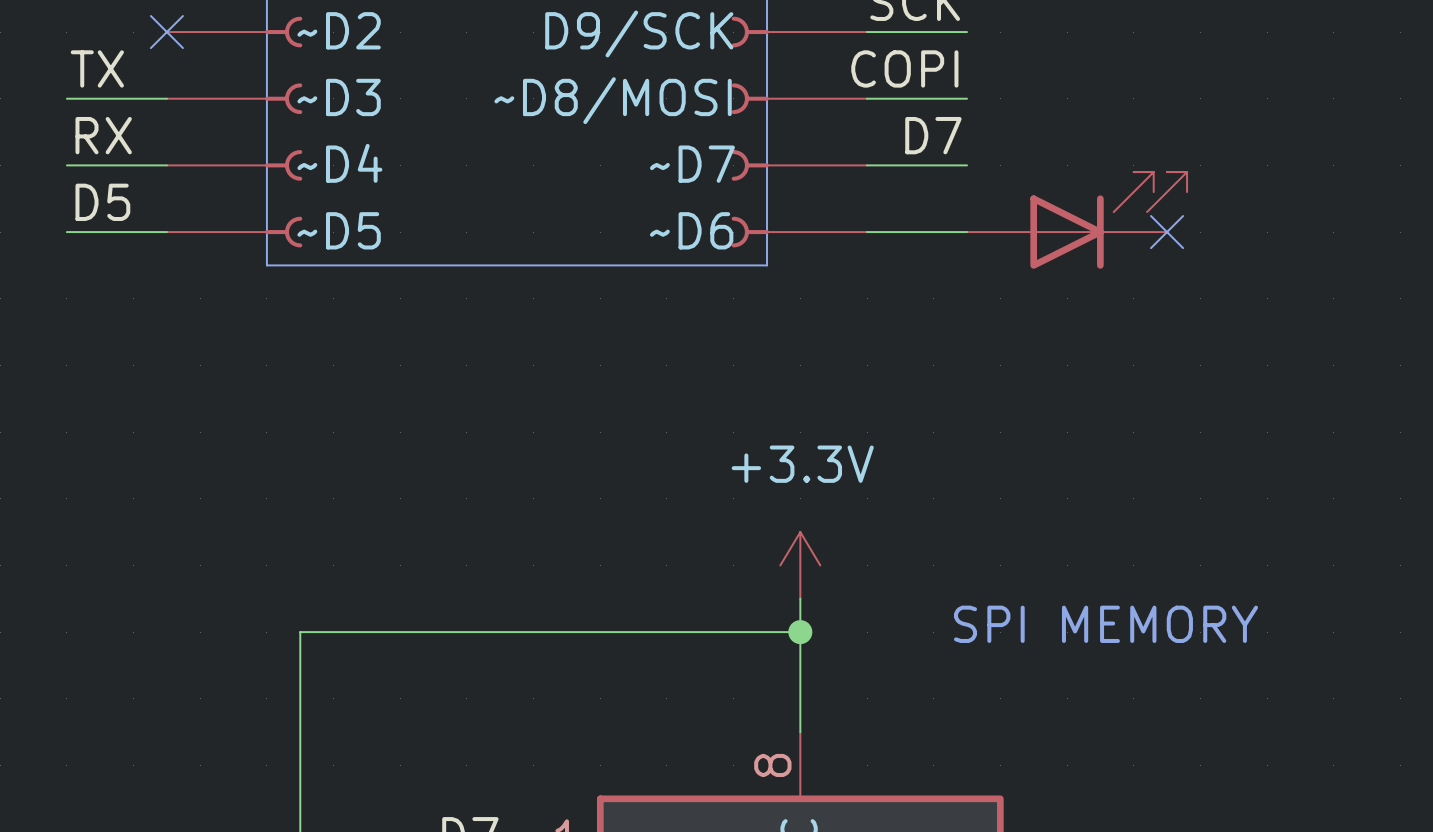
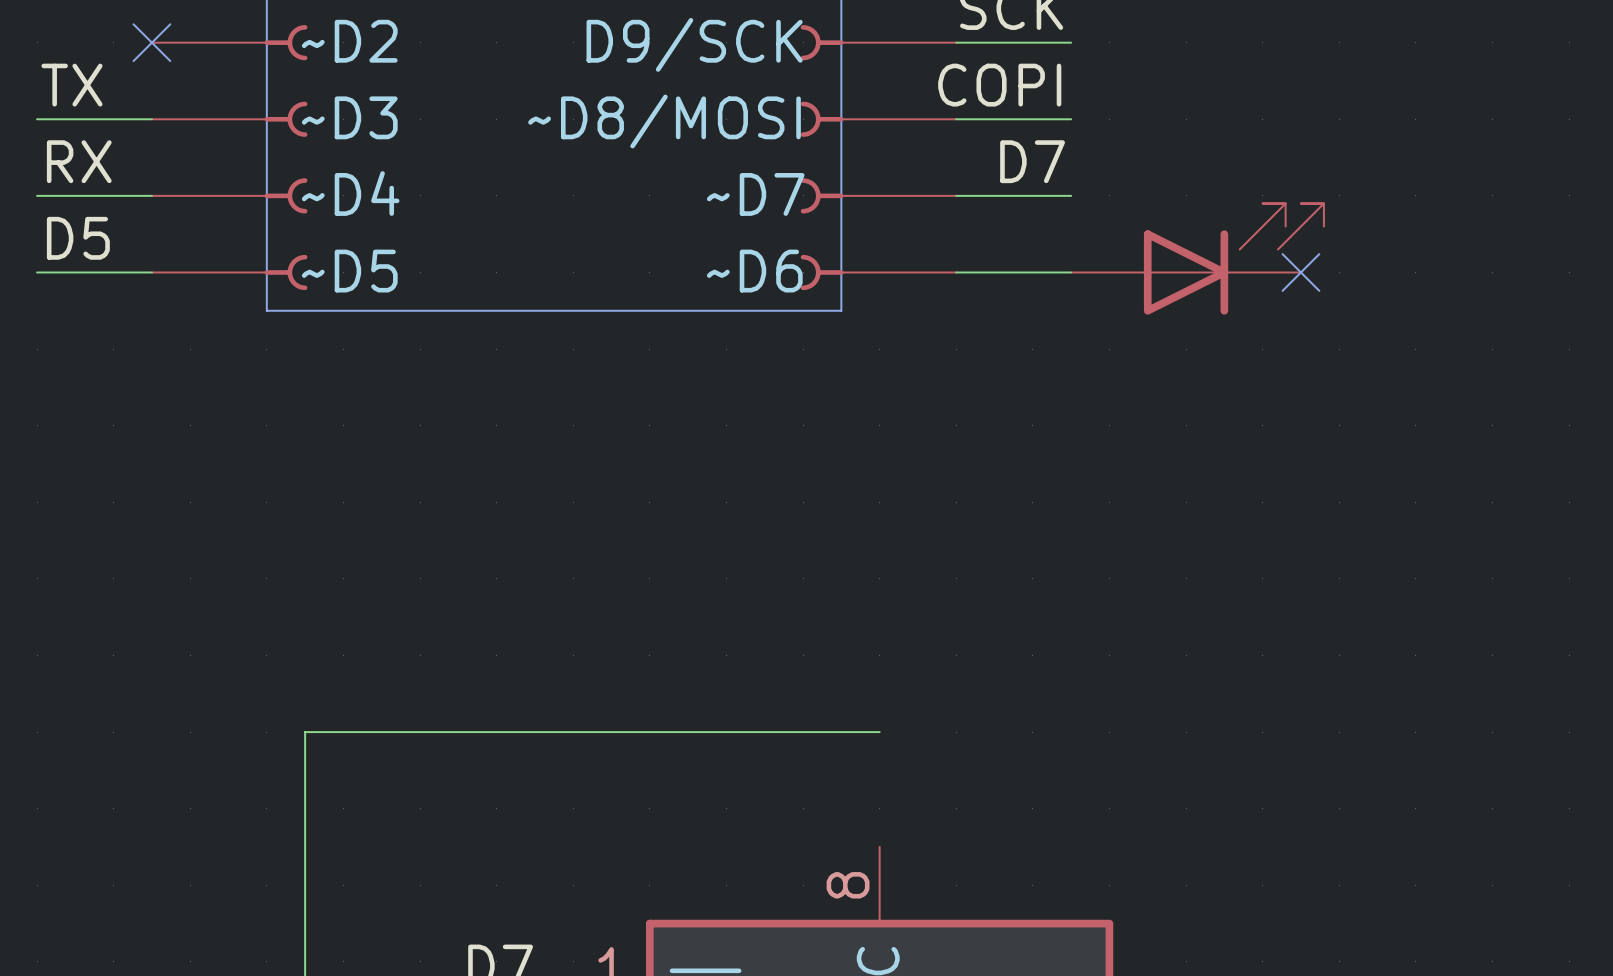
power symbol: +3.3V (800, 565) -> none
wire: (800, 598) (800, 732) -> none
text: SPI MEMORY (1106, 624) -> none
junction: (800, 632) -> none

